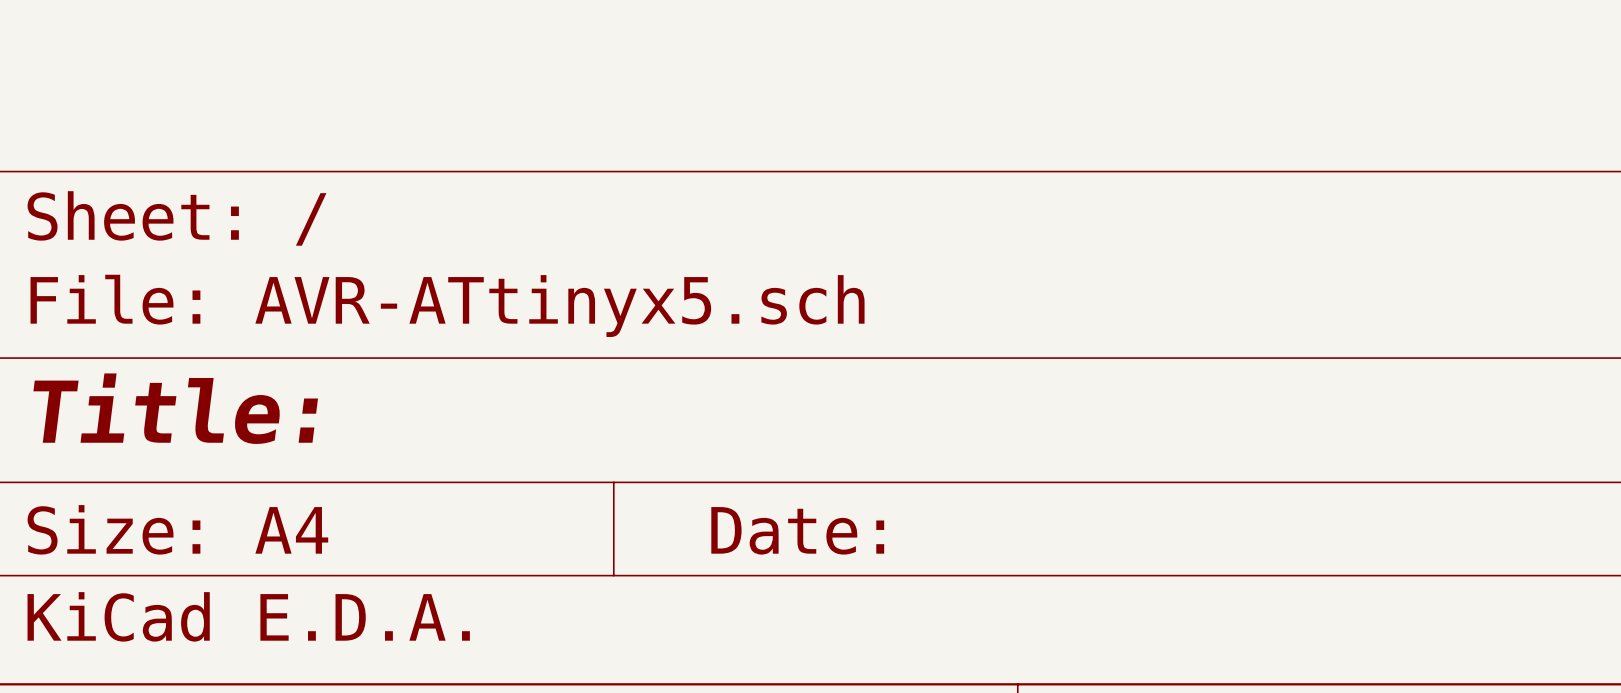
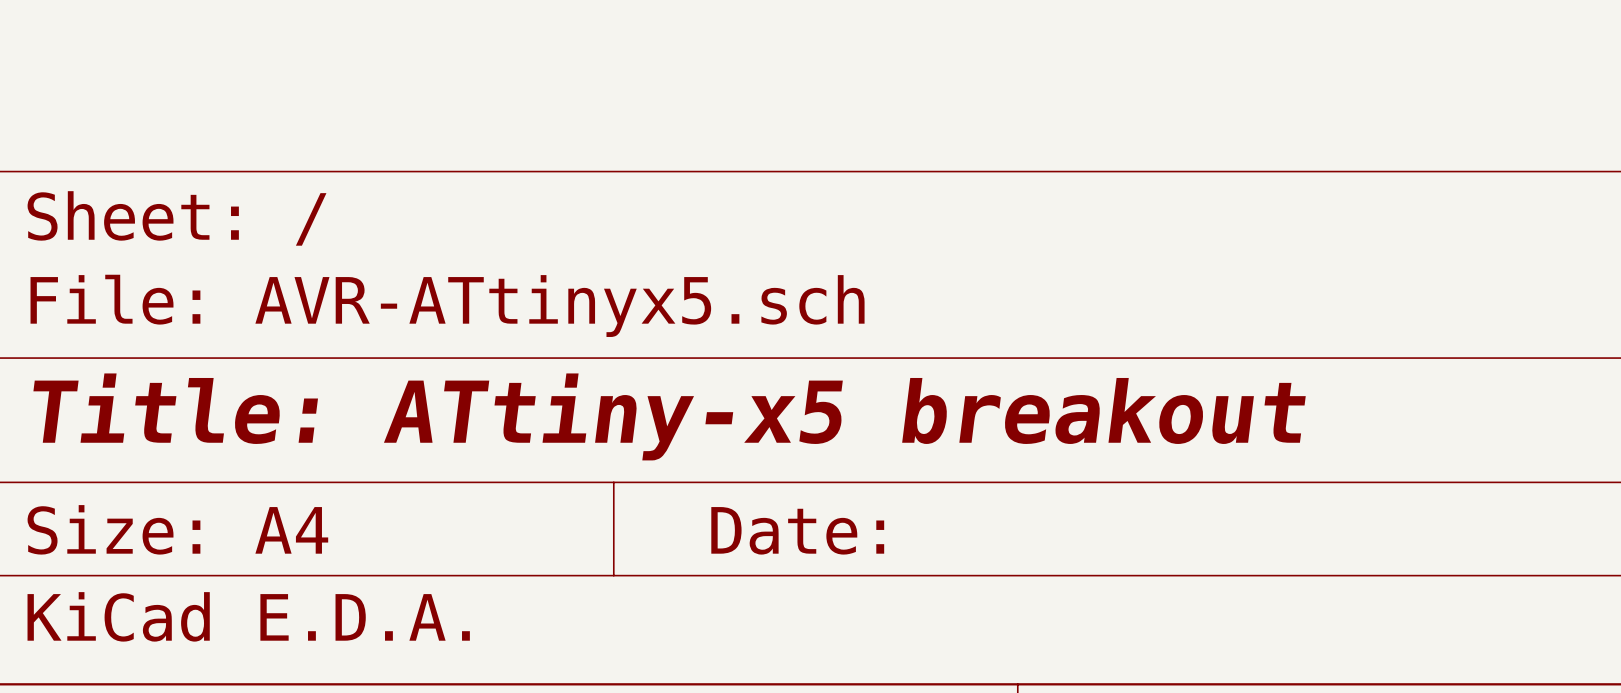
title block: Title: (175, 408) -> Title: ATtiny-x5 breakout (669, 416)

